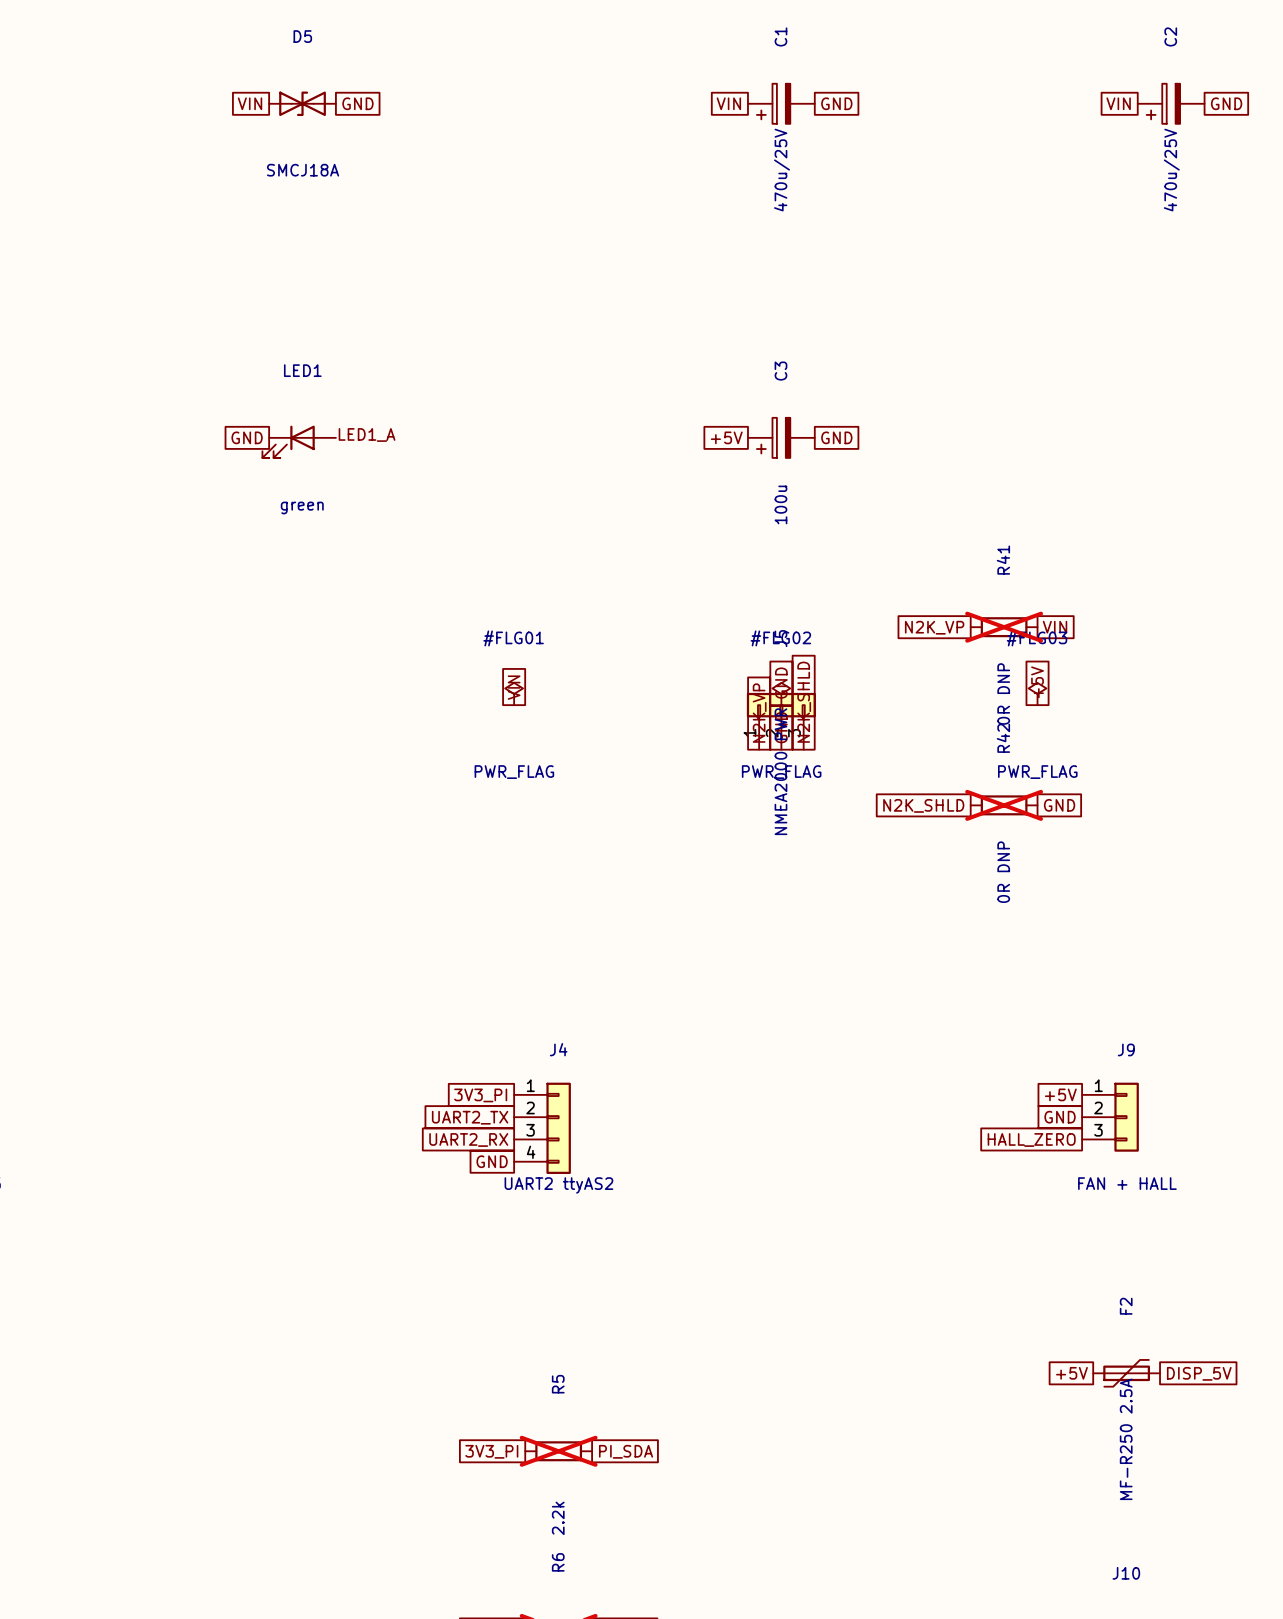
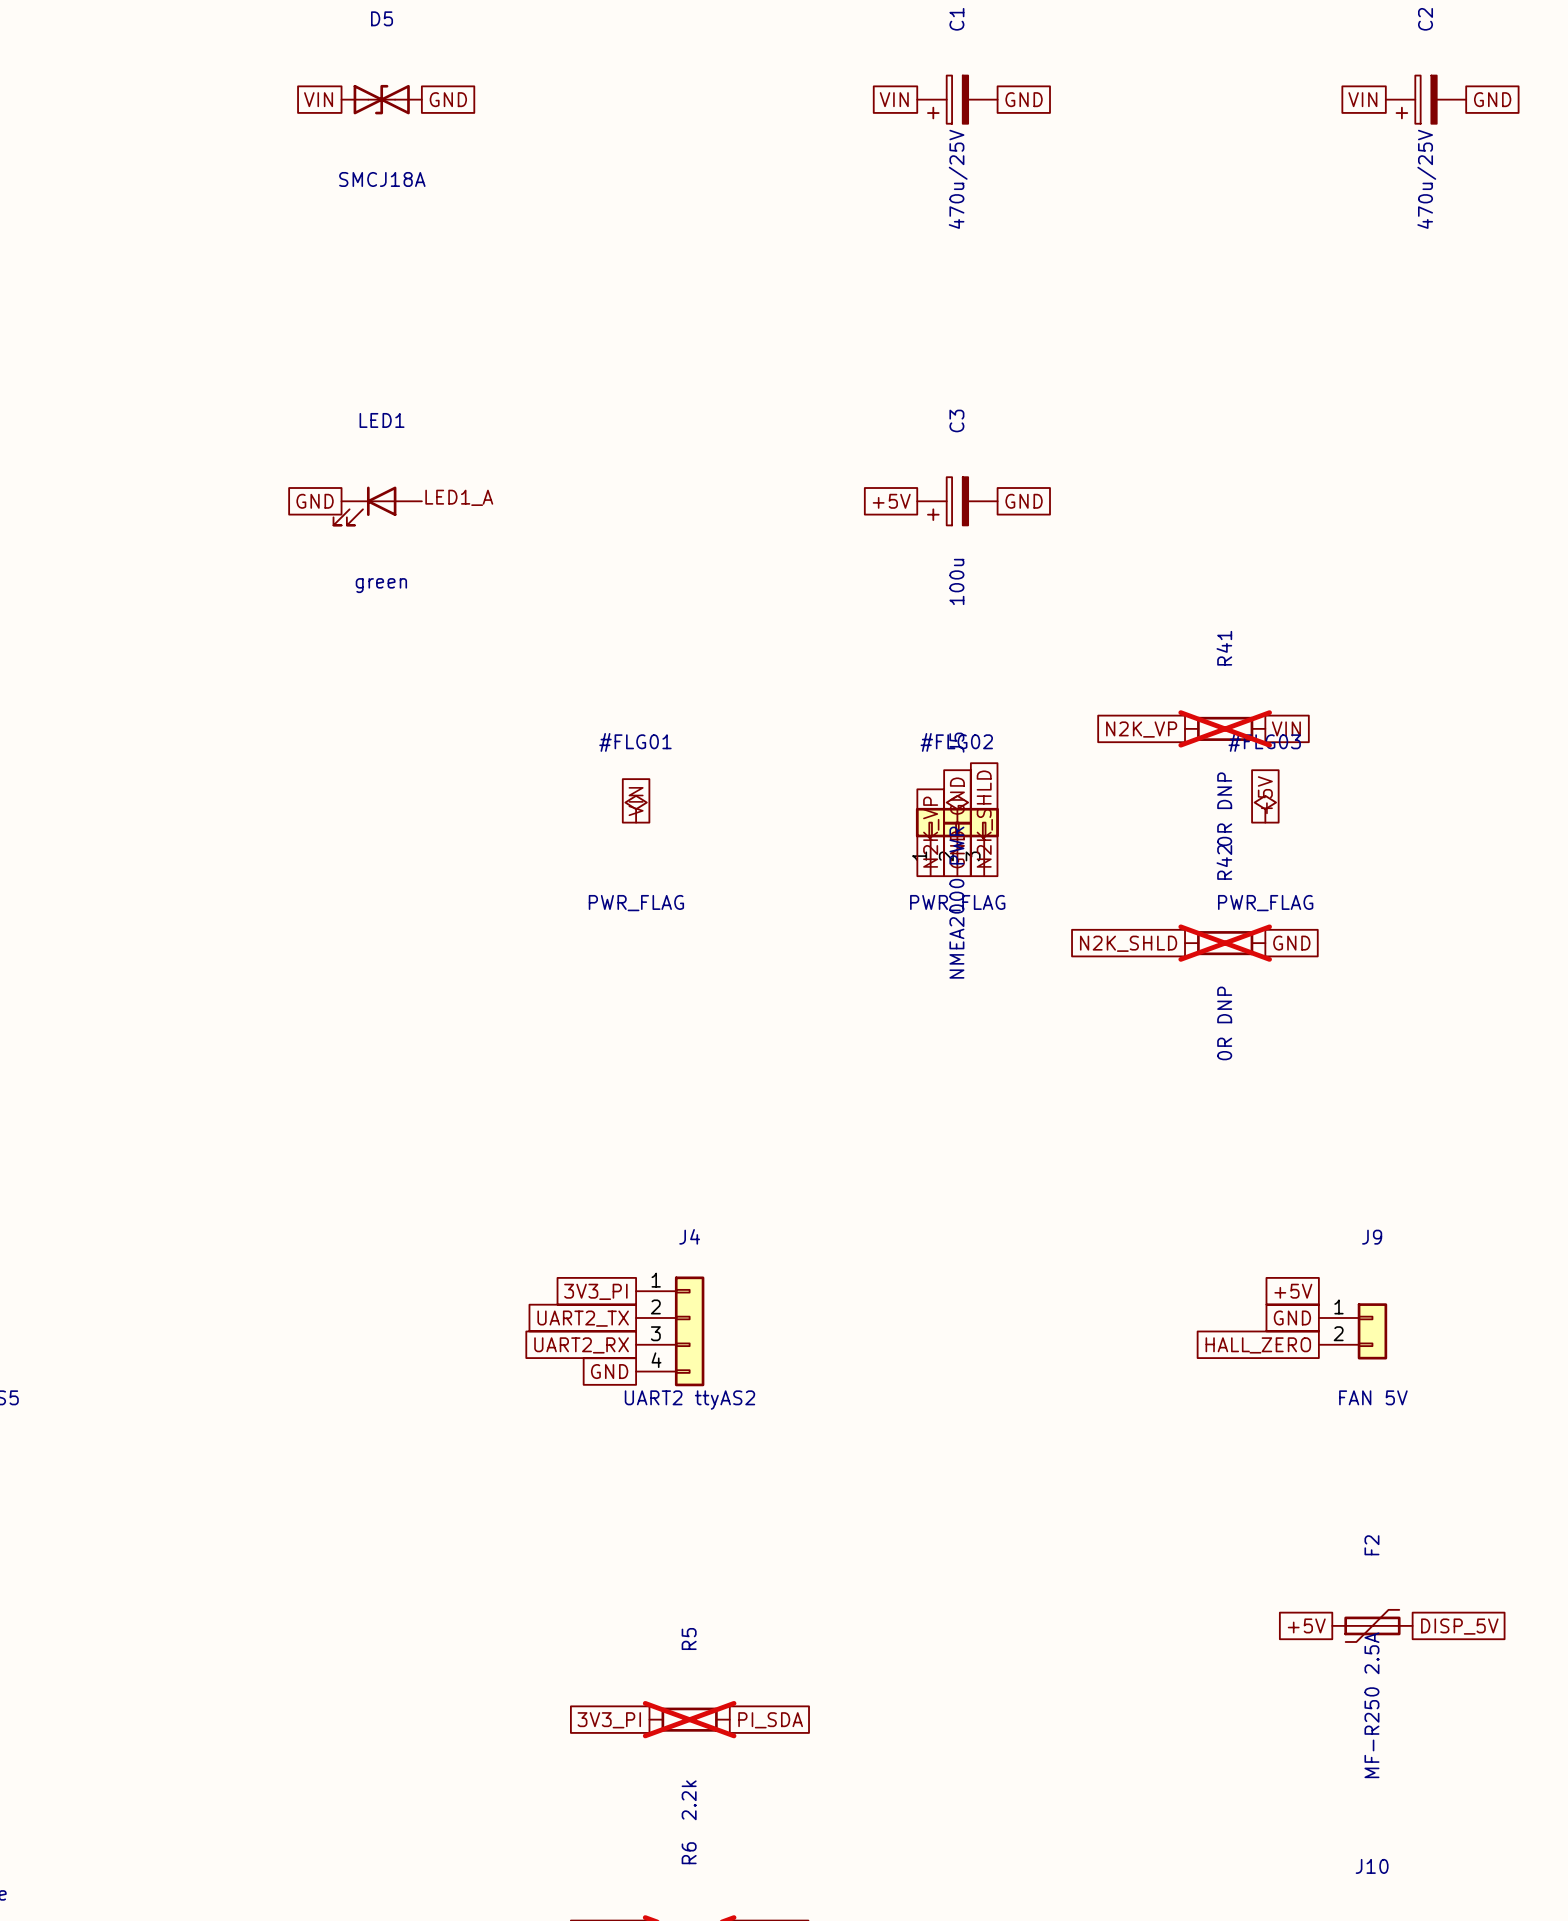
J9 symbol: [1082, 1082, 1139, 1152] -> [1318, 1303, 1388, 1360]
J9 value: FAN + HALL (1127, 1183) -> FAN 5V (1373, 1397)

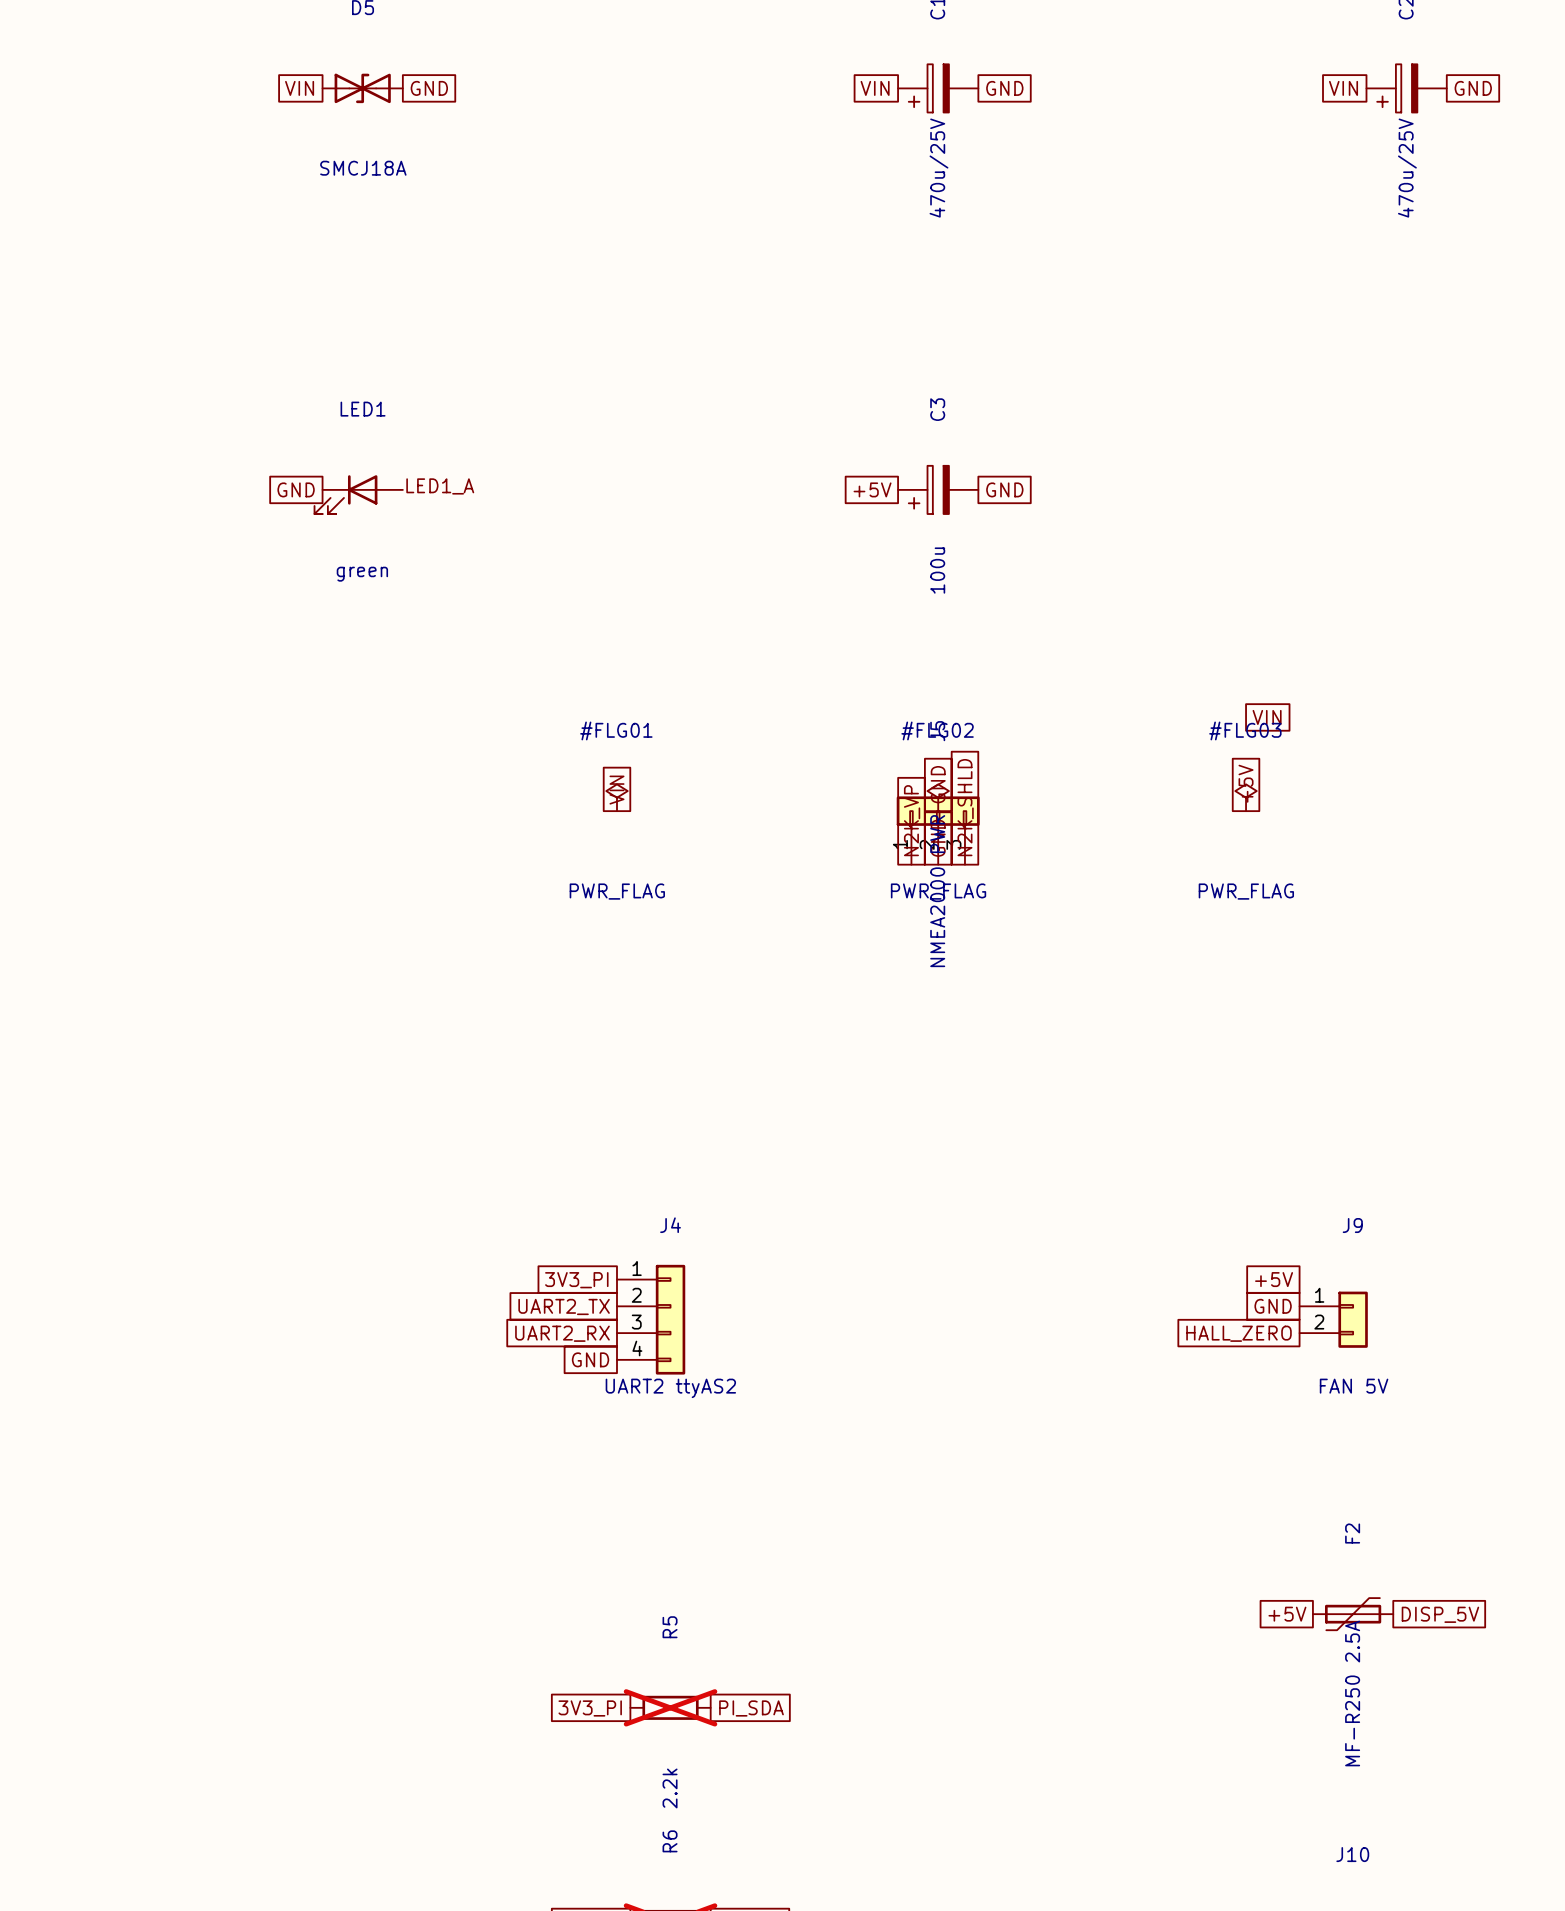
R41: 0R DNP (1225, 728) -> none
global label: N2K_VP (1141, 729) -> none
global label: N2K_SHLD (1128, 943) -> none
R42: 0R DNP (1225, 943) -> none
global label: GND (1291, 943) -> none

